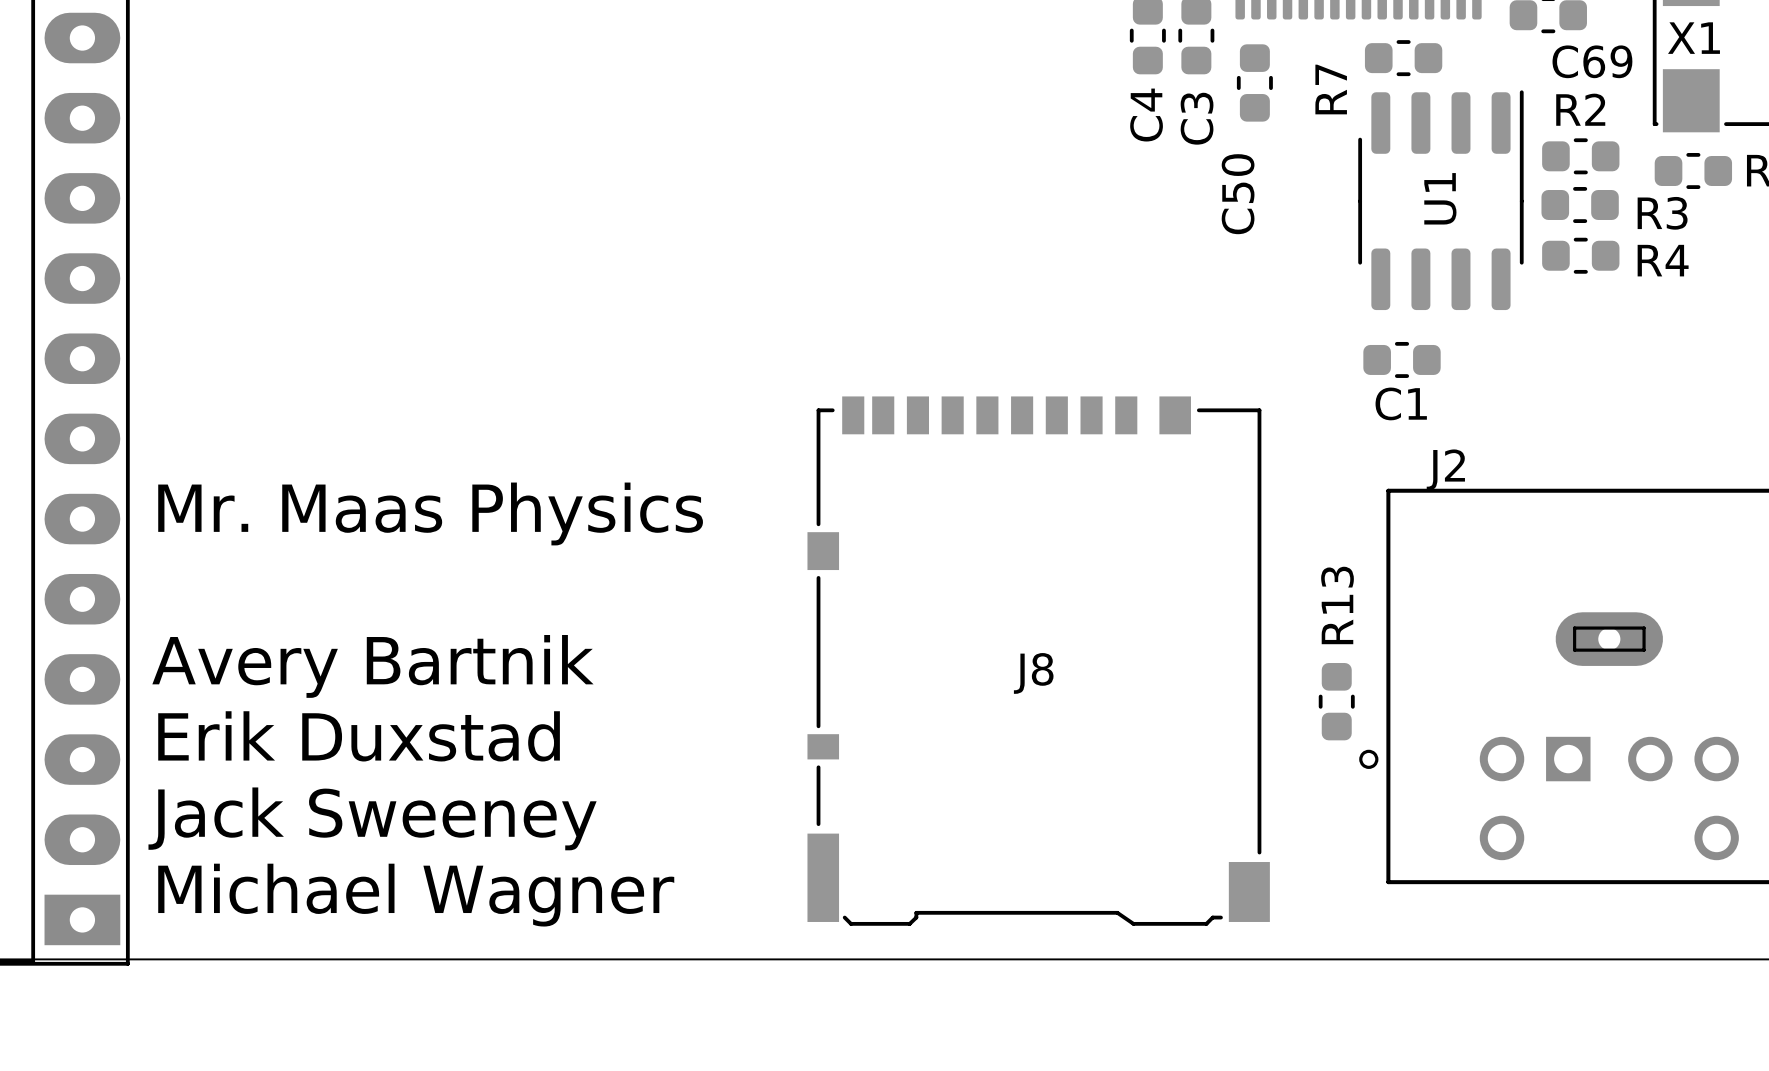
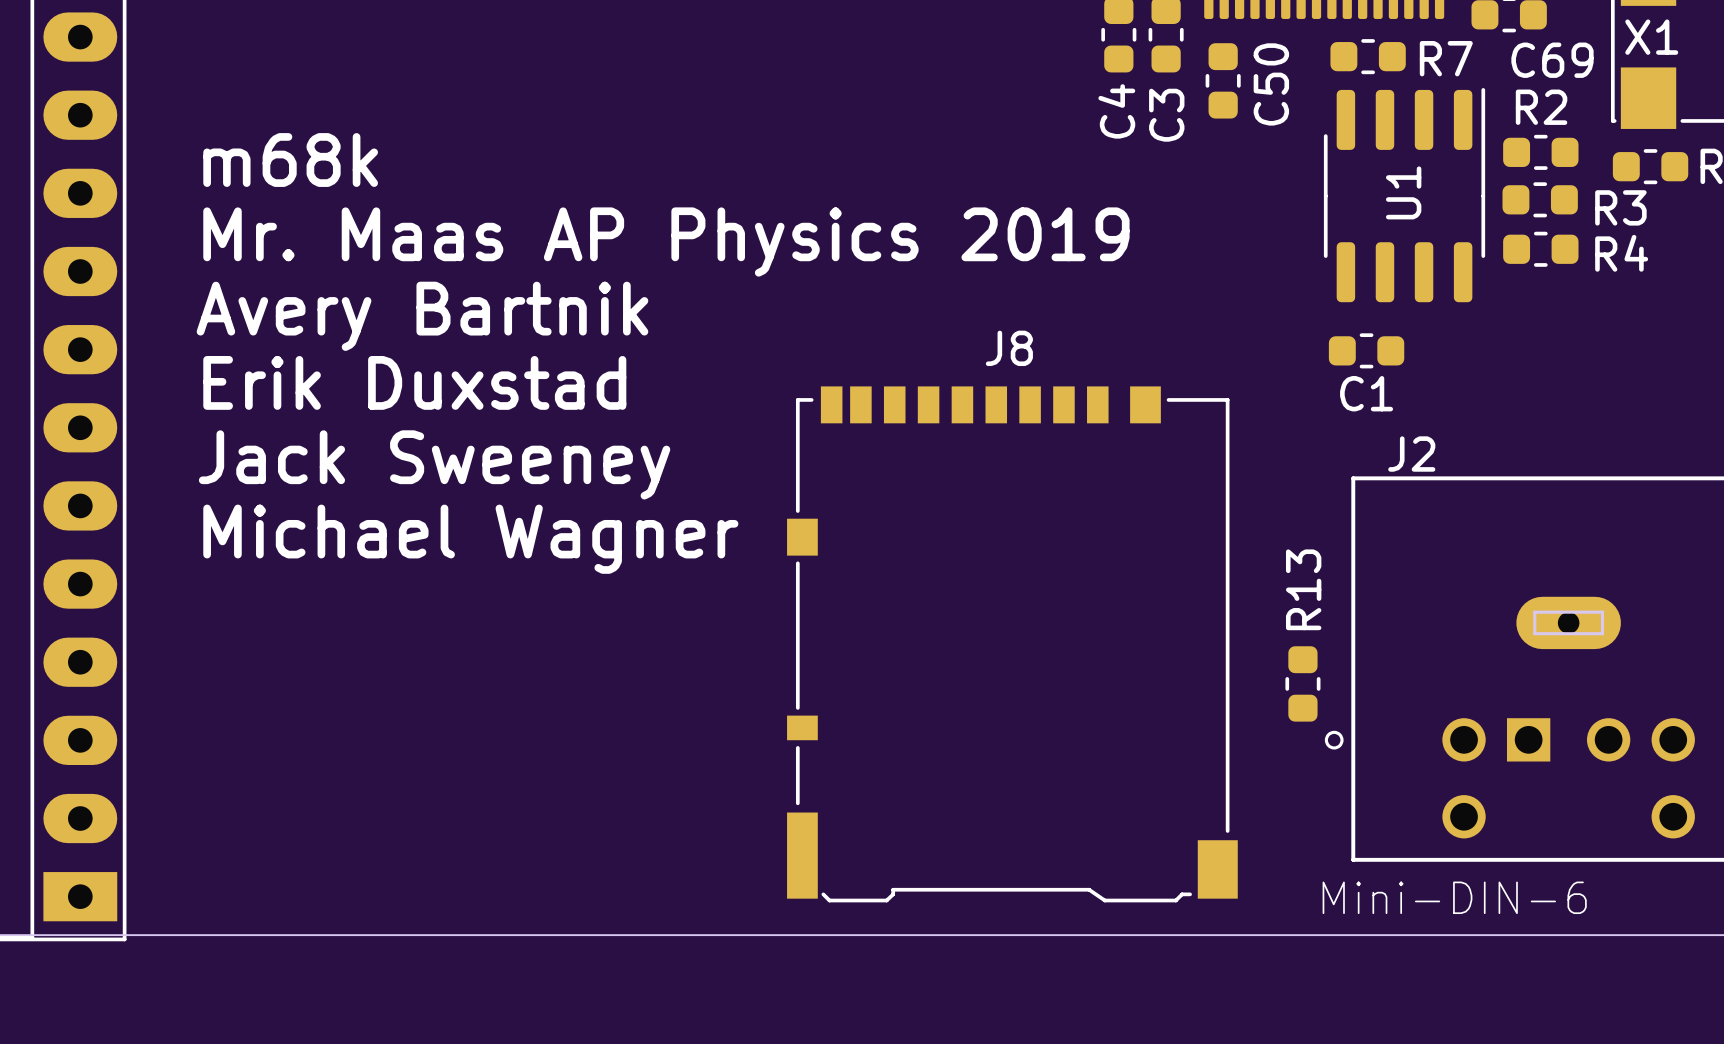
R7 name rotation: 0° (1331, 89) -> 90° clockwise (1446, 58)
R7 name position: R7 (1331, 89) -> R7 (1446, 58)
text: none -> m68k (290, 160)
C50 name position: C50 (1238, 194) -> C50 (1271, 84)
text: none -> Mr. Maas AP Physics 2019 (666, 242)
text: Mr. Maas Physics (430, 513) -> none
text position: Avery Bartnik (372, 666) -> Avery Bartnik (422, 316)
J8 name position: J8 (1033, 673) -> J8 (1009, 348)
text position: Erik Duxstad (359, 736) -> Erik Duxstad (414, 382)
text position: Jack Sweeney (372, 818) -> Jack Sweeney (434, 464)
text position: Michael Wagner (416, 895) -> Michael Wagner (470, 539)
J2 value: none -> Mini-DIN-6 (1454, 897)

